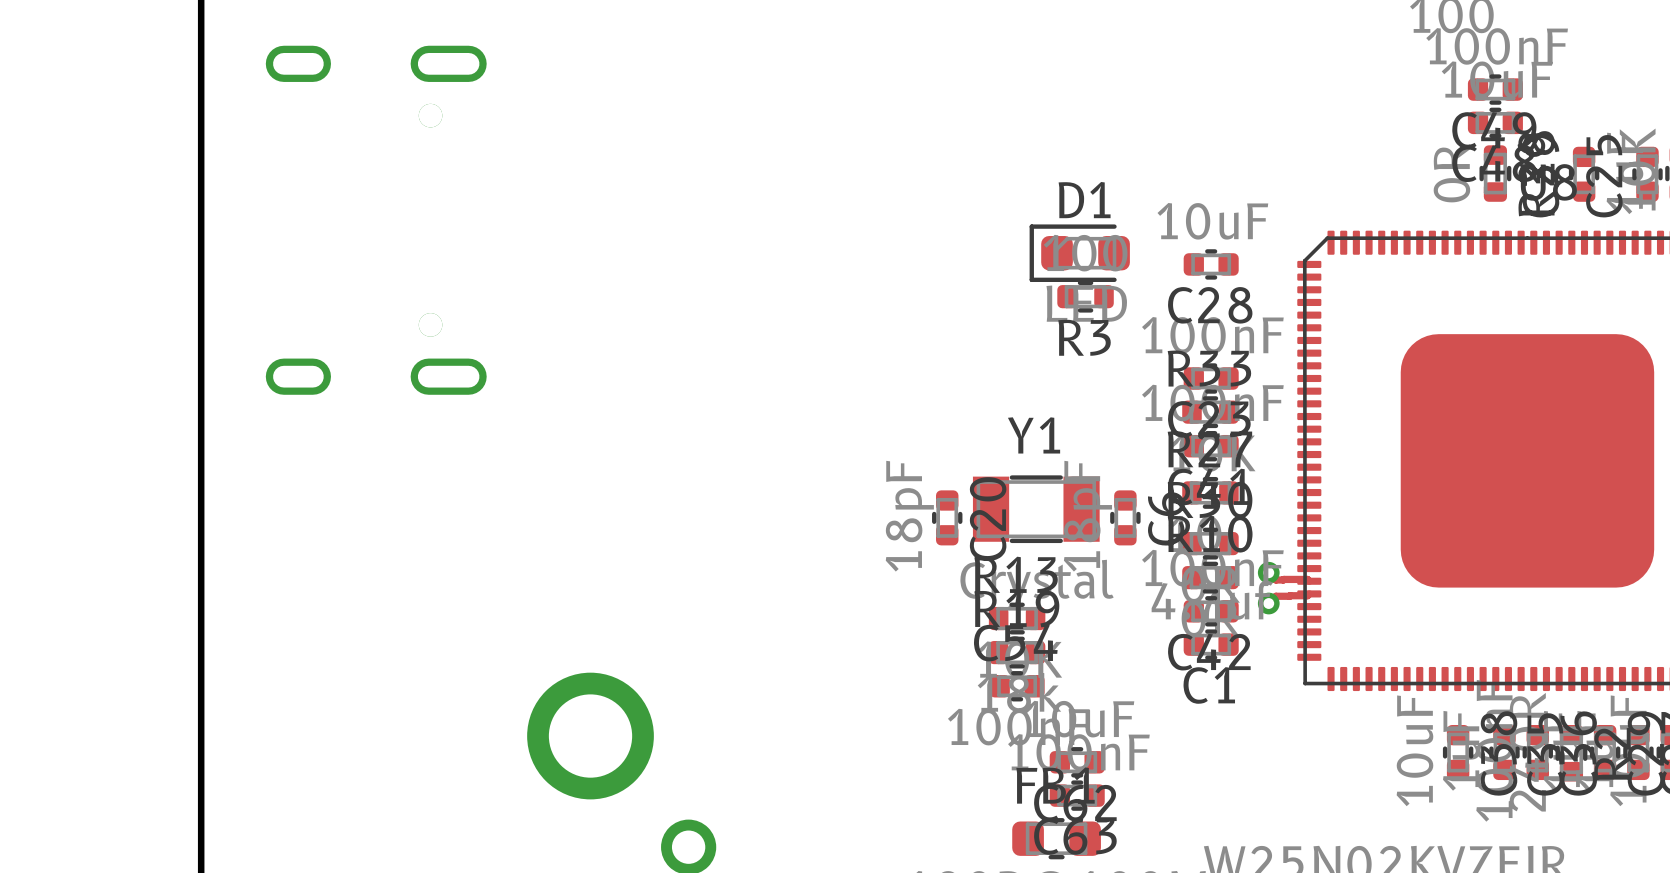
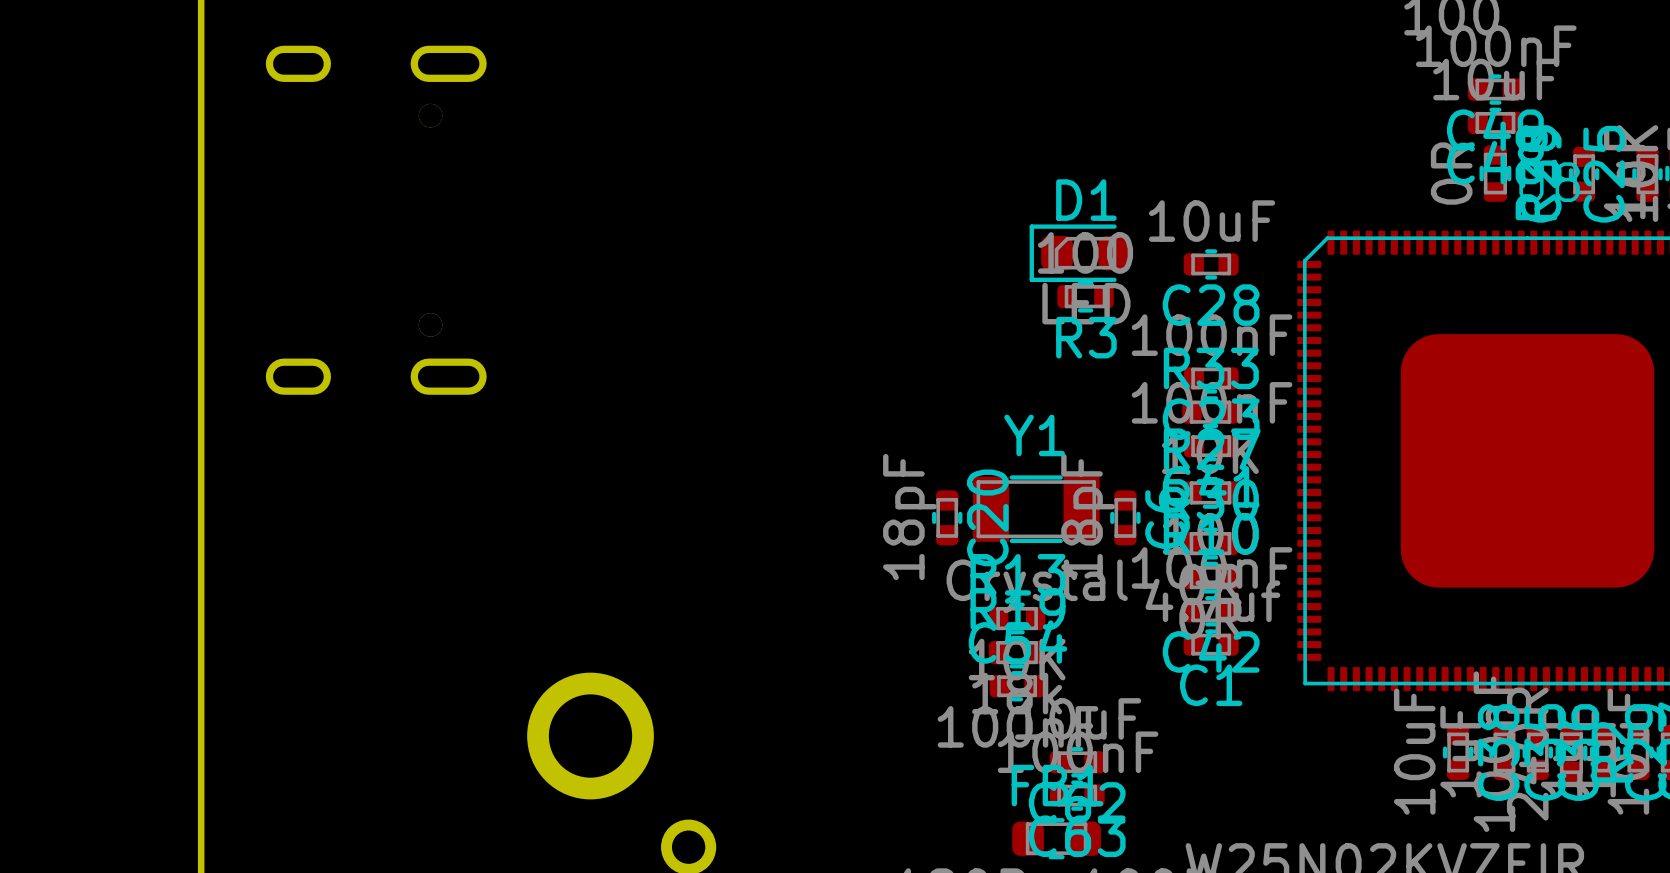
track: (1268, 572) (1276, 579) (1307, 579) (1309, 581) -> none
via: (1268, 572) -> none
track: (1309, 593) (1307, 595) (1276, 596) (1268, 603) -> none
via: (1268, 603) -> none

